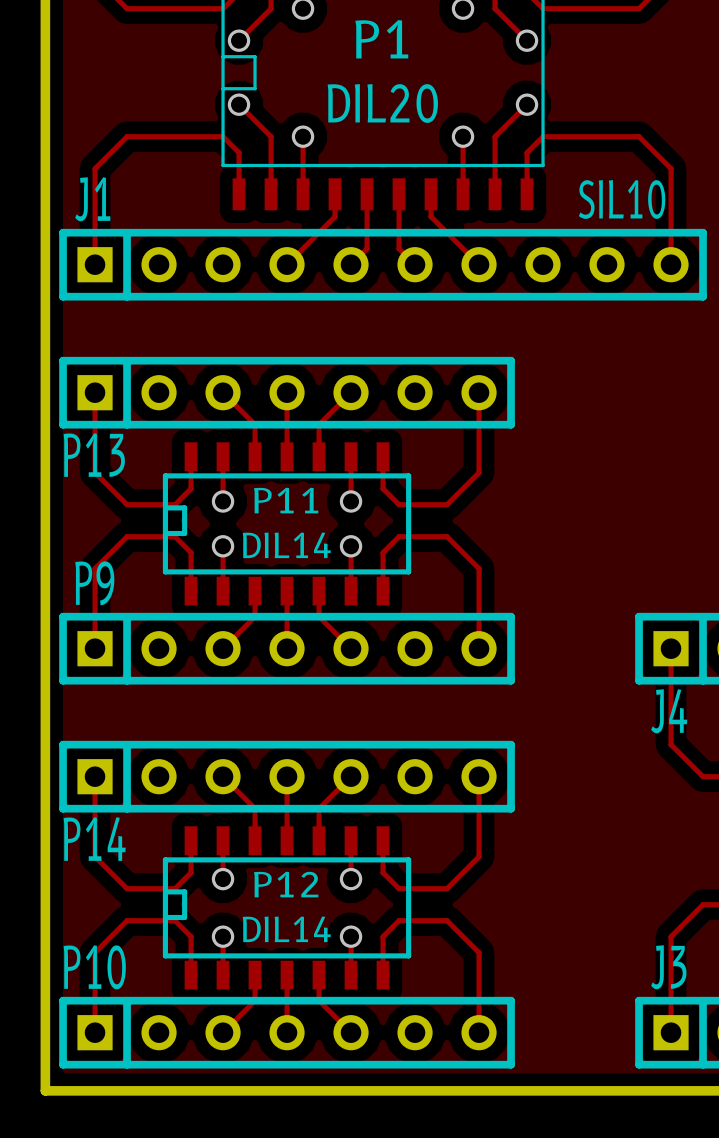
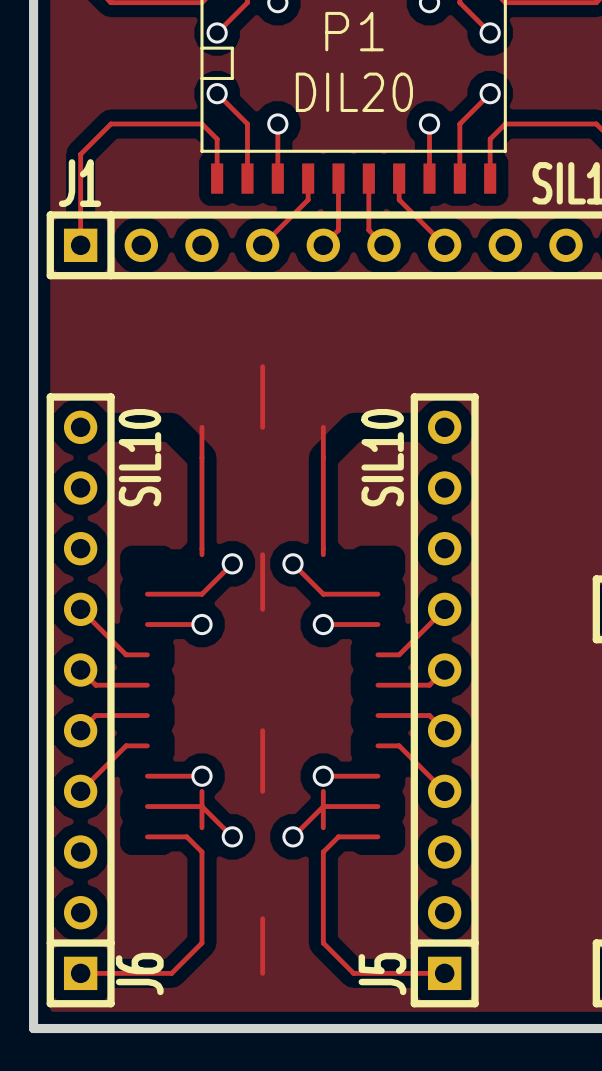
track: (95, 392) (95, 472) (127, 504) (175, 504) (191, 488) (191, 456) -> none
track: (223, 392) (255, 424) (255, 456) -> none
P13: (287, 392) -> none
track: (351, 392) (319, 424) (319, 456) -> none
track: (479, 392) (479, 472) (447, 504) (399, 504) (383, 488) (383, 456) -> none
track: none -> (201, 469) (201, 512)
via: (223, 501) -> none
track: none -> (323, 469) (323, 512)
via: (351, 501) -> none
P11: DIL14 (287, 523) -> none
via: (223, 546) -> none
via: (351, 546) -> none
track: (191, 591) (191, 552) (175, 536) (127, 536) (95, 568) (95, 648) -> (147, 654) (126, 654) (80, 609)
track: (255, 591) (255, 616) (223, 648) -> none
track: (319, 591) (319, 616) (351, 648) -> none
track: (383, 591) (383, 552) (399, 536) (447, 536) (479, 568) (479, 648) -> (377, 654) (399, 654) (444, 609)
track: none -> (232, 563) (201, 594) (147, 594)
via: none -> (232, 563)
track: none -> (292, 563) (323, 594) (377, 594)
via: none -> (292, 563)
P9: (287, 648) -> none
track: none -> (147, 624) (201, 624)
via: none -> (201, 624)
track: none -> (323, 624) (377, 624)
via: none -> (323, 624)
track: none -> (80, 670) (95, 685) (147, 685)
track: none -> (444, 670) (429, 685) (377, 685)
J6: none -> SIL10 (80, 700)
J5: none -> SIL10 (444, 700)
track: (95, 776) (95, 856) (127, 888) (165, 888) -> (80, 730) (95, 715) (147, 715)
track: (223, 776) (255, 808) (255, 840) -> none
P14: (287, 776) -> none
track: (351, 776) (319, 808) (319, 840) -> none
track: (479, 776) (479, 856) (447, 888) (408, 888) -> (444, 730) (429, 715) (377, 715)
track: none -> (147, 745) (126, 745) (80, 791)
track: none -> (377, 745) (399, 745) (444, 791)
track: none -> (147, 776) (201, 776)
via: none -> (201, 776)
track: none -> (323, 776) (377, 776)
via: none -> (323, 776)
track: (191, 840) (191, 872) (175, 888) -> (201, 882) (201, 852) (186, 836) (156, 836)
track: (383, 840) (383, 872) (399, 888) -> (323, 882) (323, 852) (338, 836) (368, 836)
track: none -> (147, 806) (201, 806) (232, 836)
track: none -> (377, 806) (323, 806) (292, 836)
via: (223, 879) -> none
via: (351, 879) -> none
via: none -> (232, 836)
via: none -> (292, 836)
P12: DIL14 (287, 907) -> none
via: (223, 936) -> none
via: (351, 936) -> none
track: (191, 975) (191, 936) (175, 920) (127, 920) (95, 952) (95, 1032) -> (201, 918) (201, 943) (171, 973) (80, 973)
track: (255, 975) (255, 1000) (223, 1032) -> none
track: (319, 975) (319, 1000) (351, 1032) -> none
track: (383, 975) (383, 936) (399, 920) (447, 920) (479, 952) (479, 1032) -> (323, 918) (323, 943) (353, 973) (444, 973)
P10: (287, 1032) -> none

